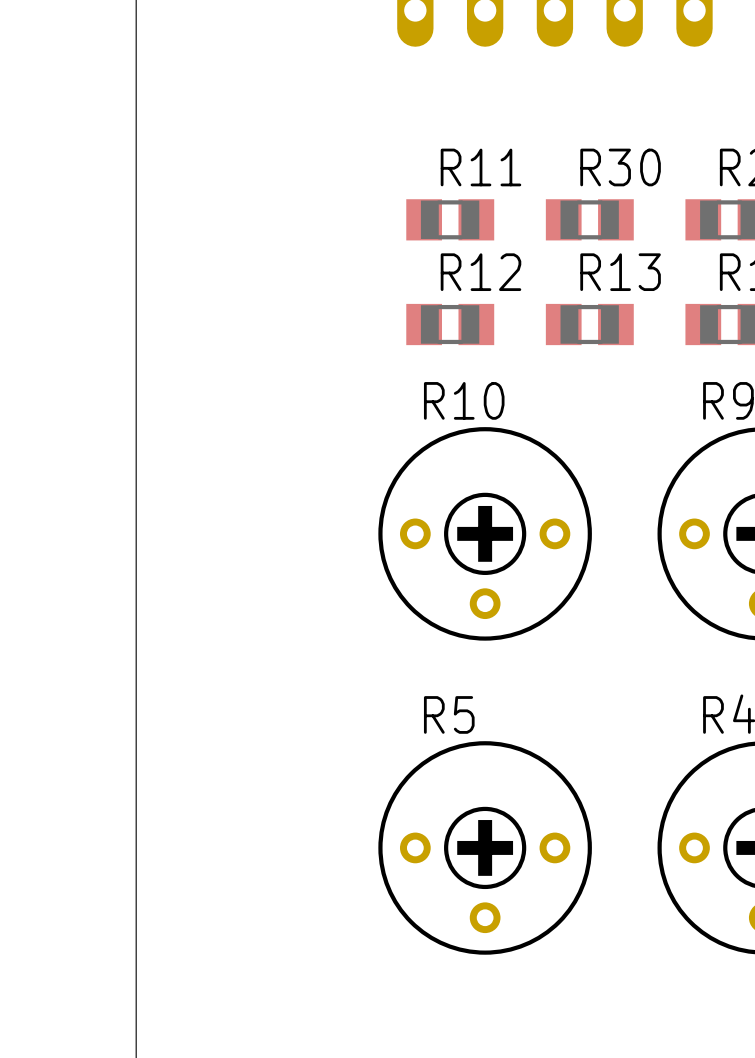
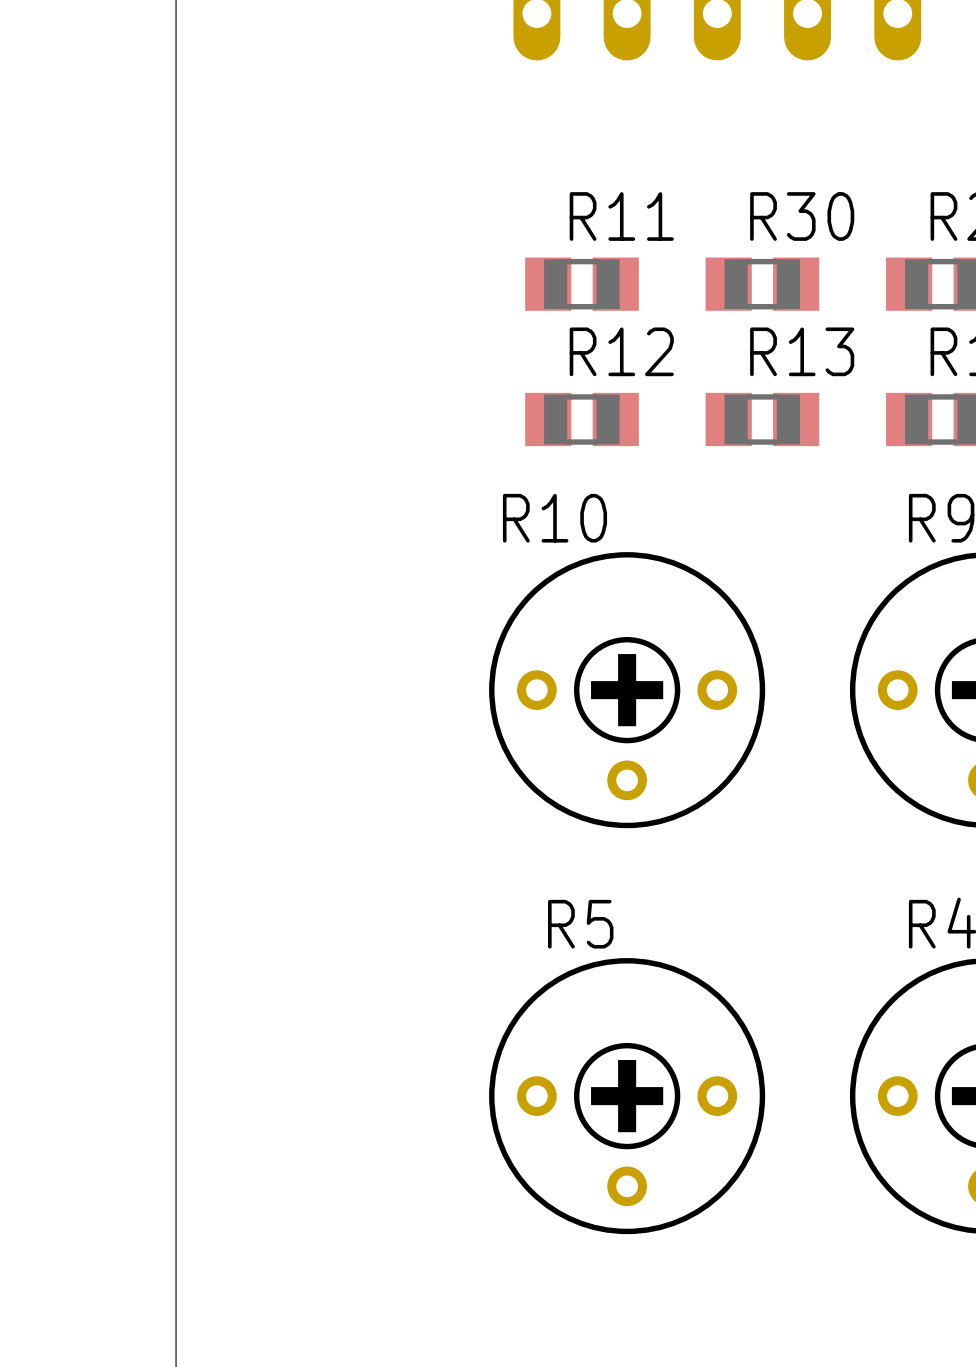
R10 name position: R10 (464, 400) -> R10 (554, 518)

